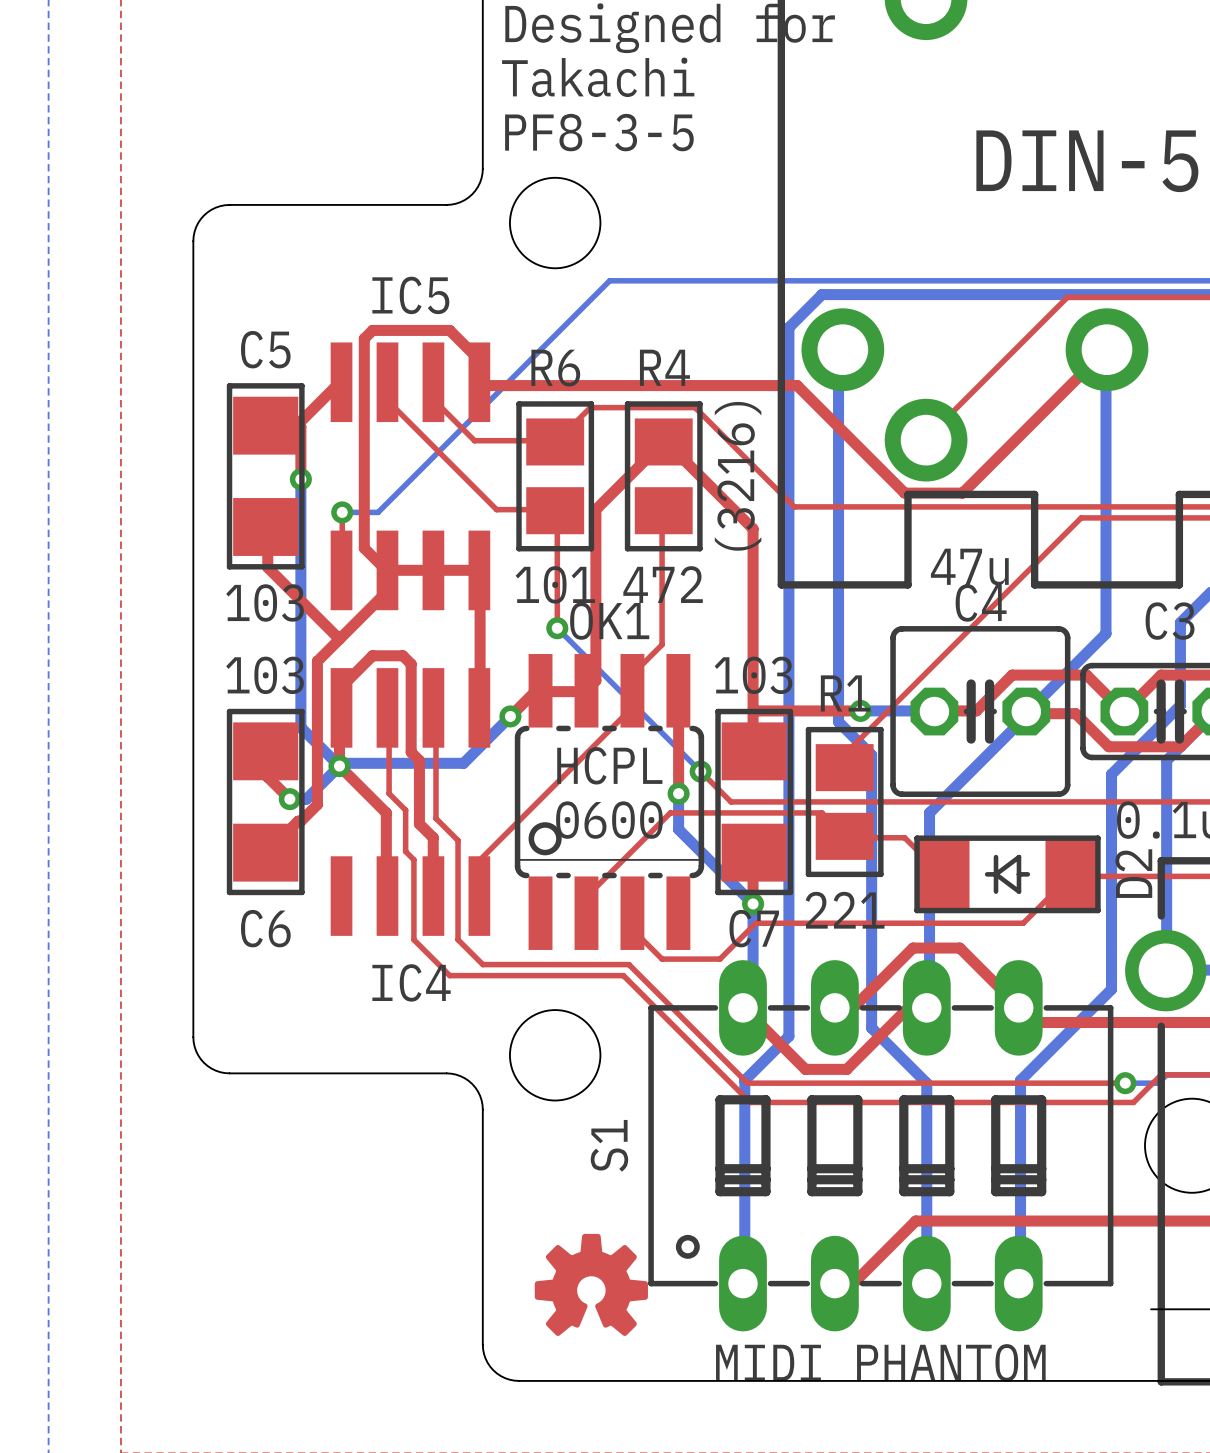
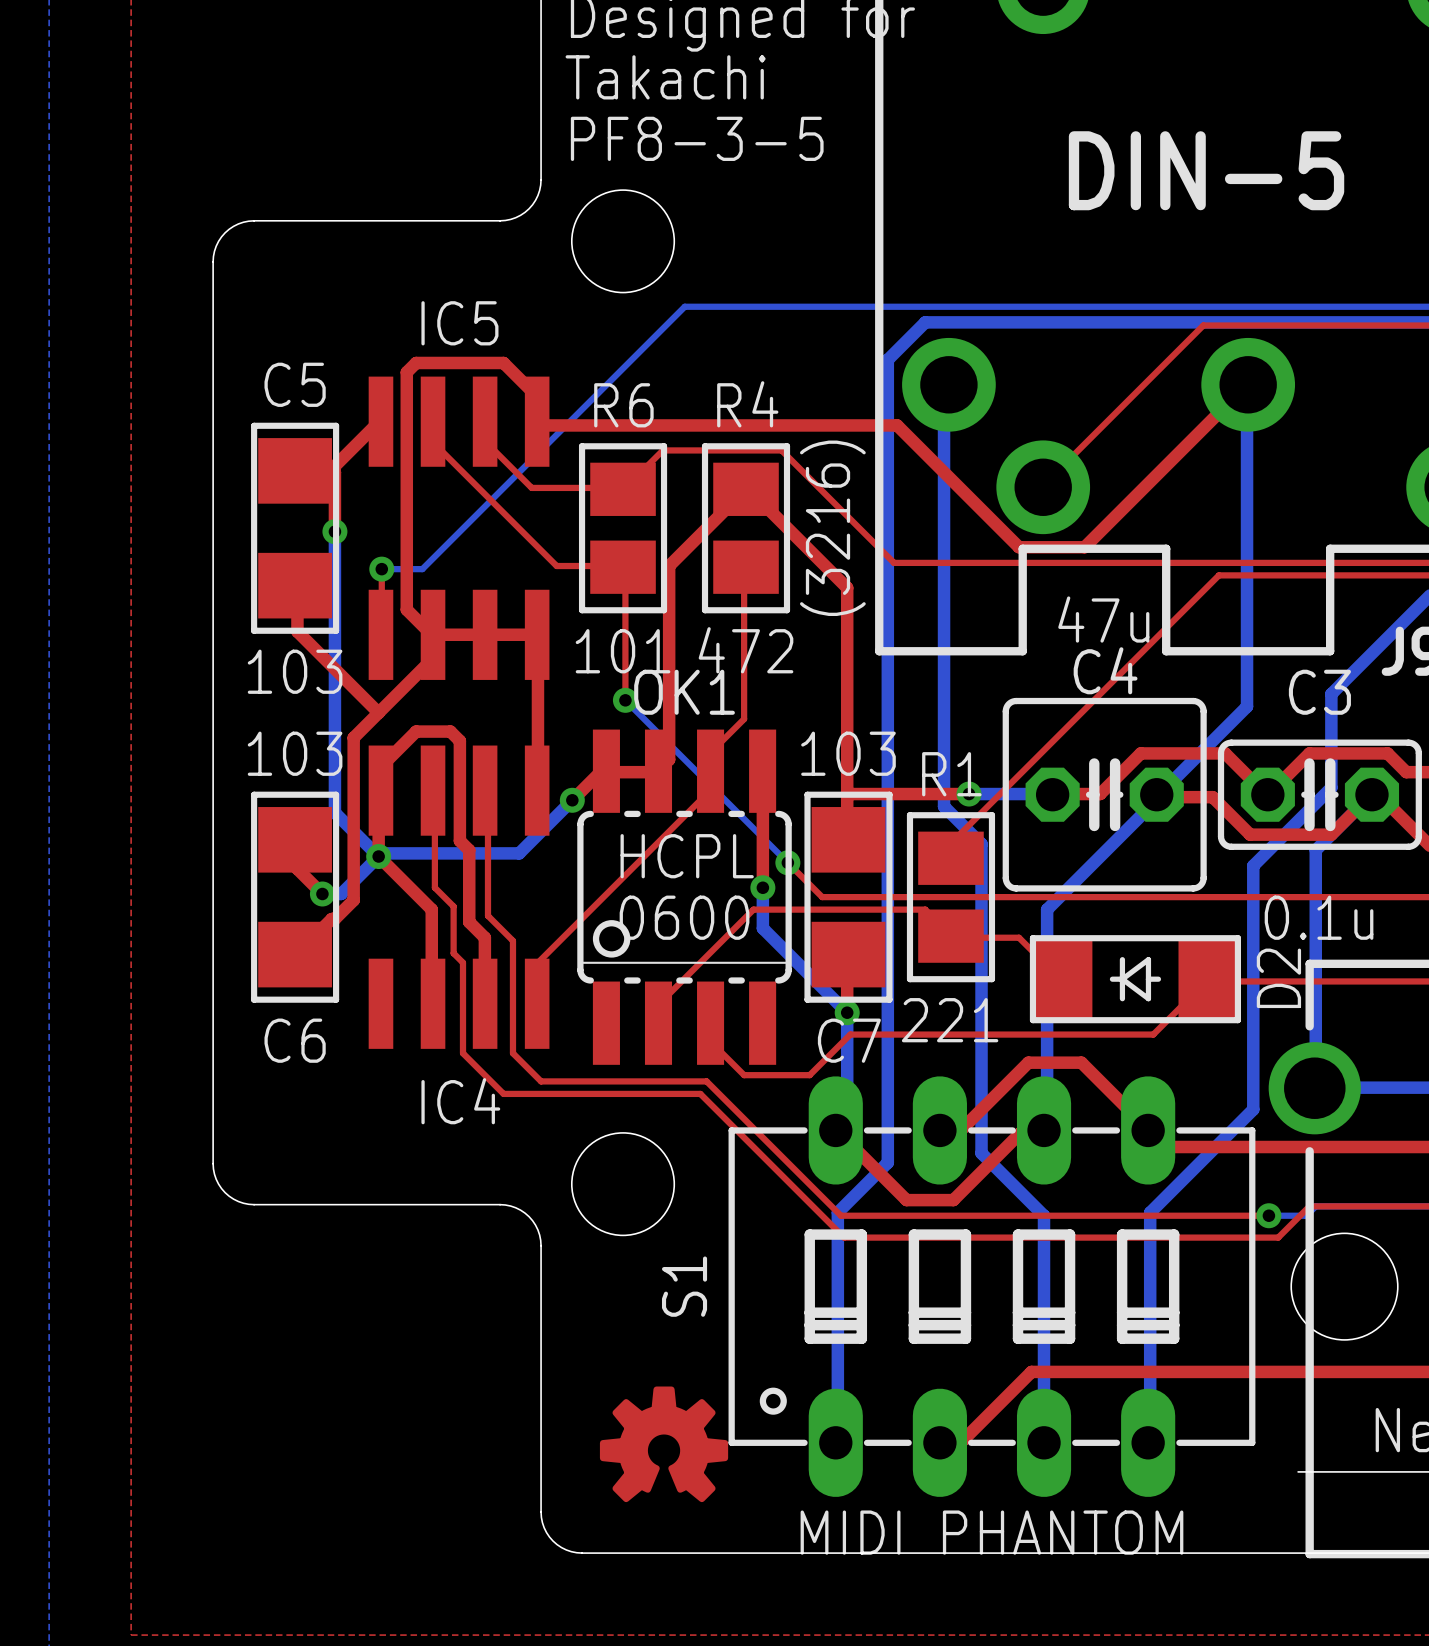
text position: 47u (969, 567) -> 47u (1103, 619)

